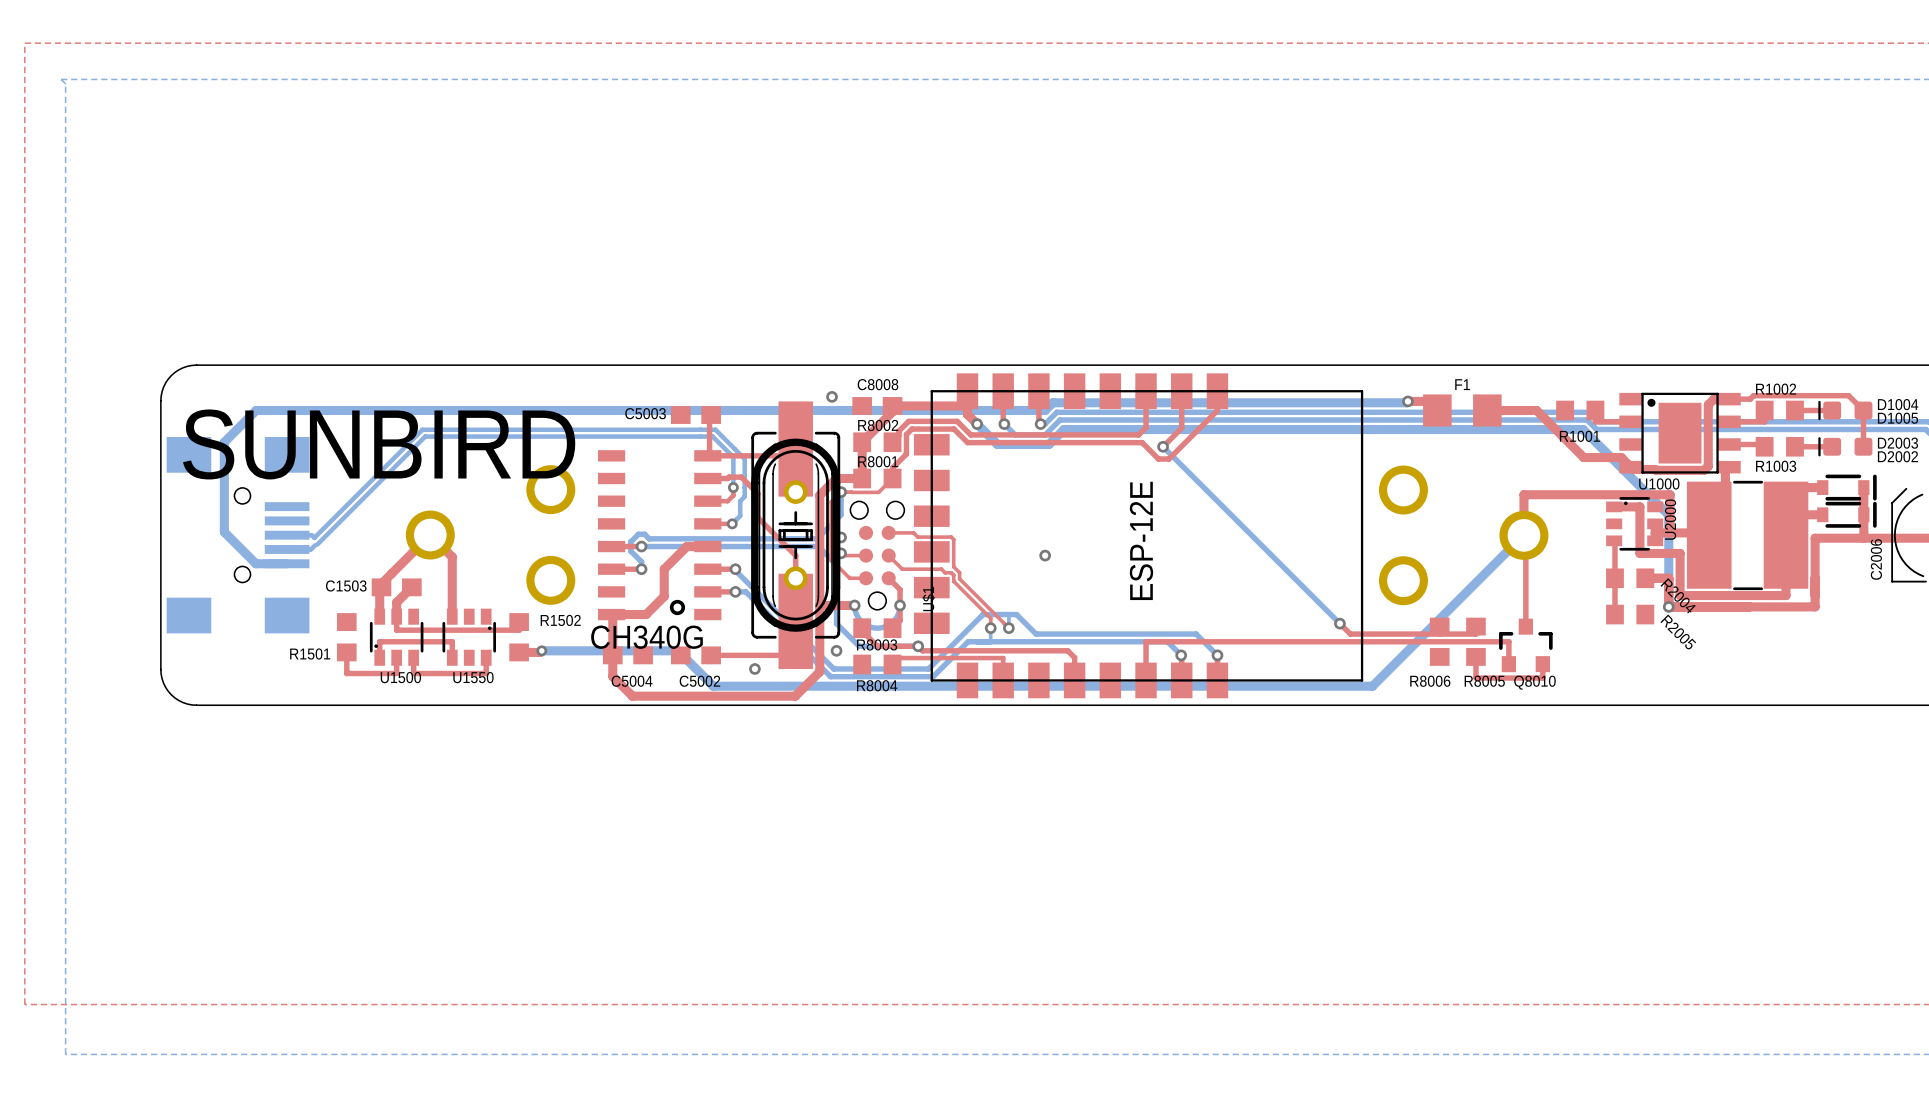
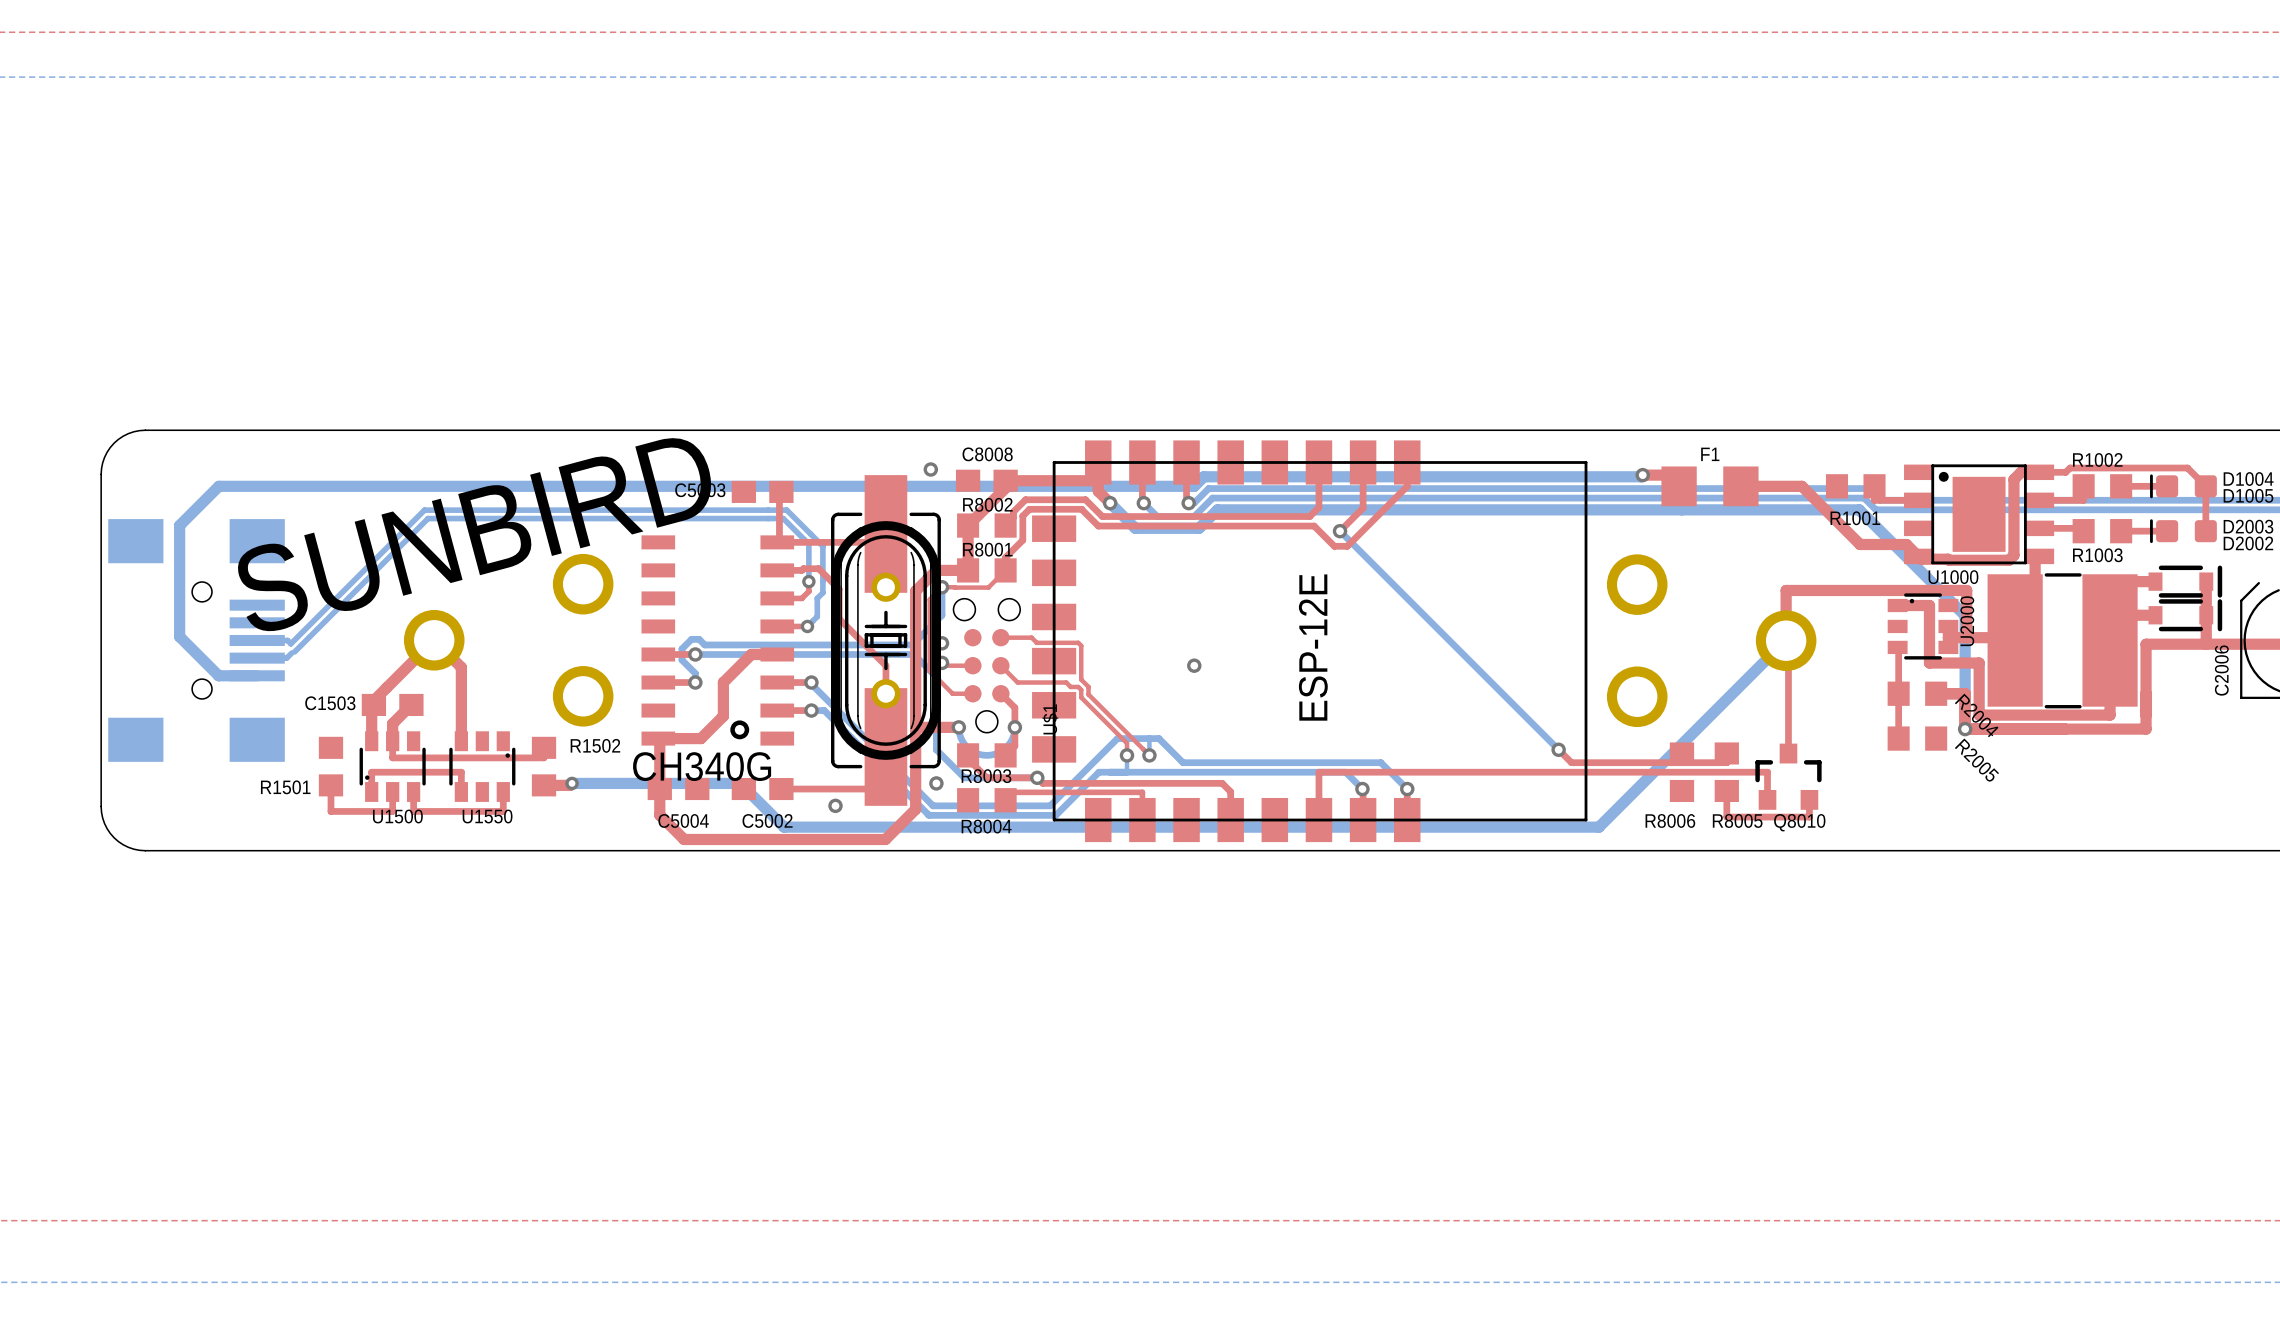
text rotation: 0° (379, 444) -> 15° counterclockwise (474, 535)

